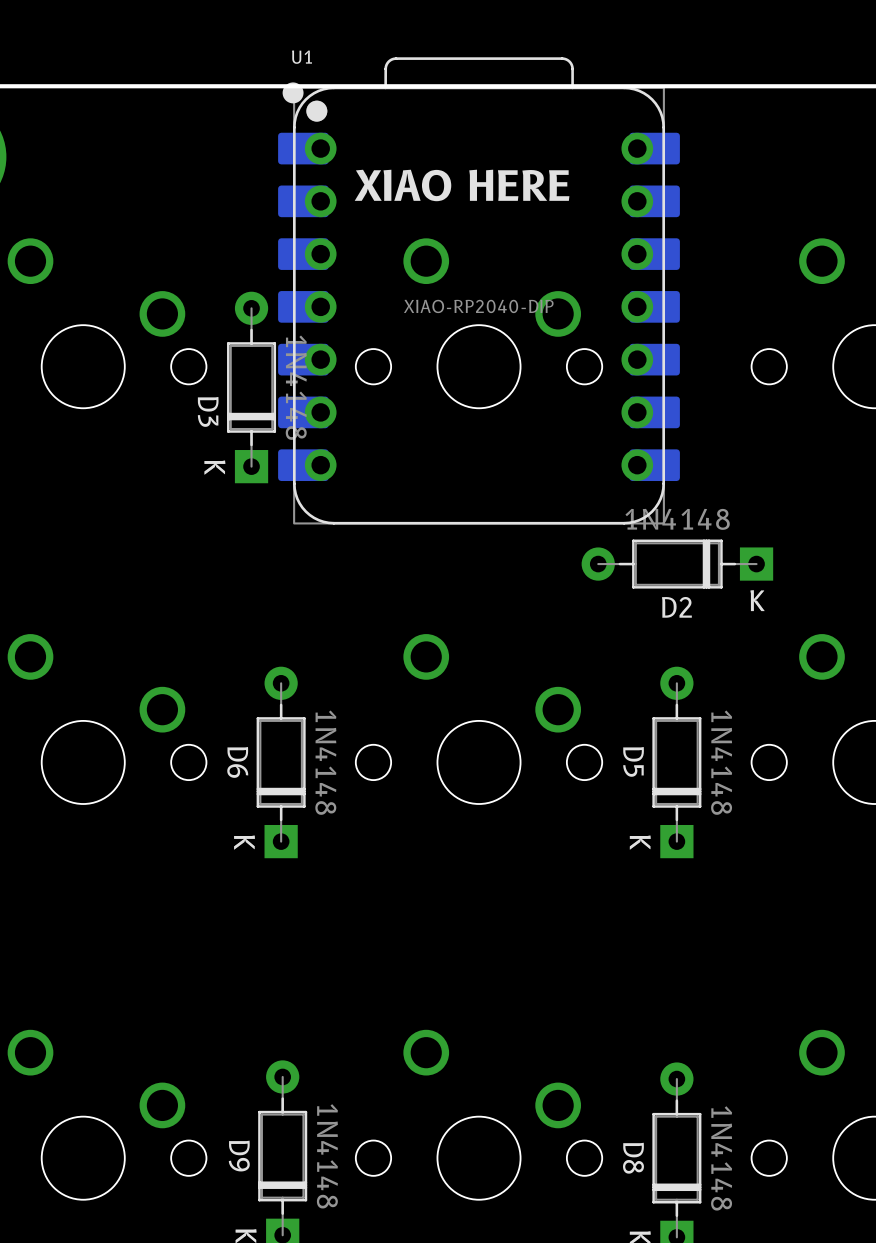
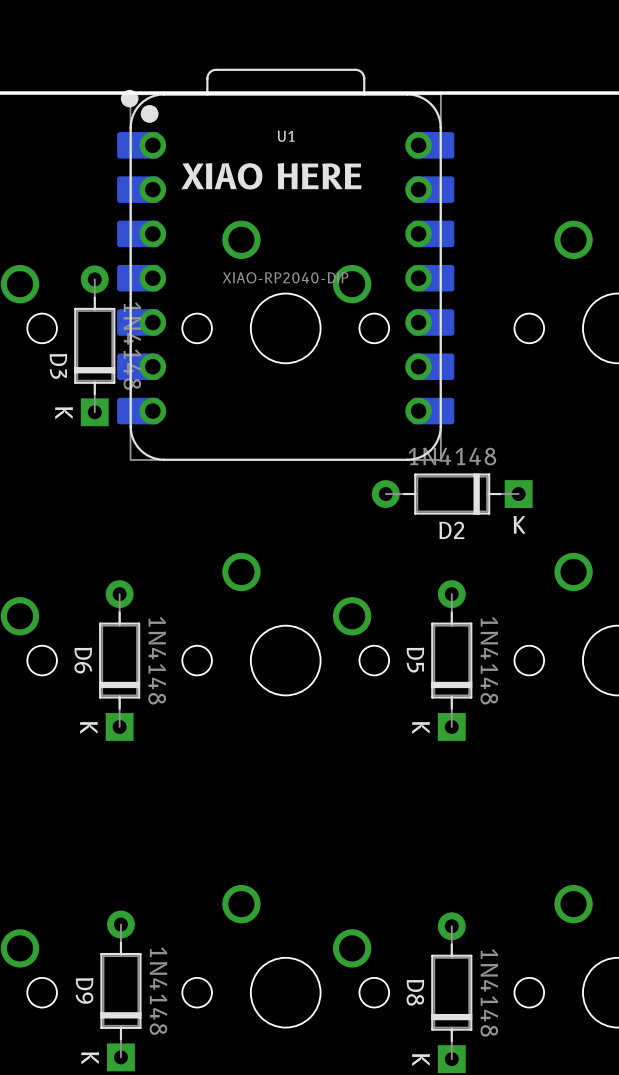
U1 name position: U1 (301, 57) -> U1 (286, 136)

